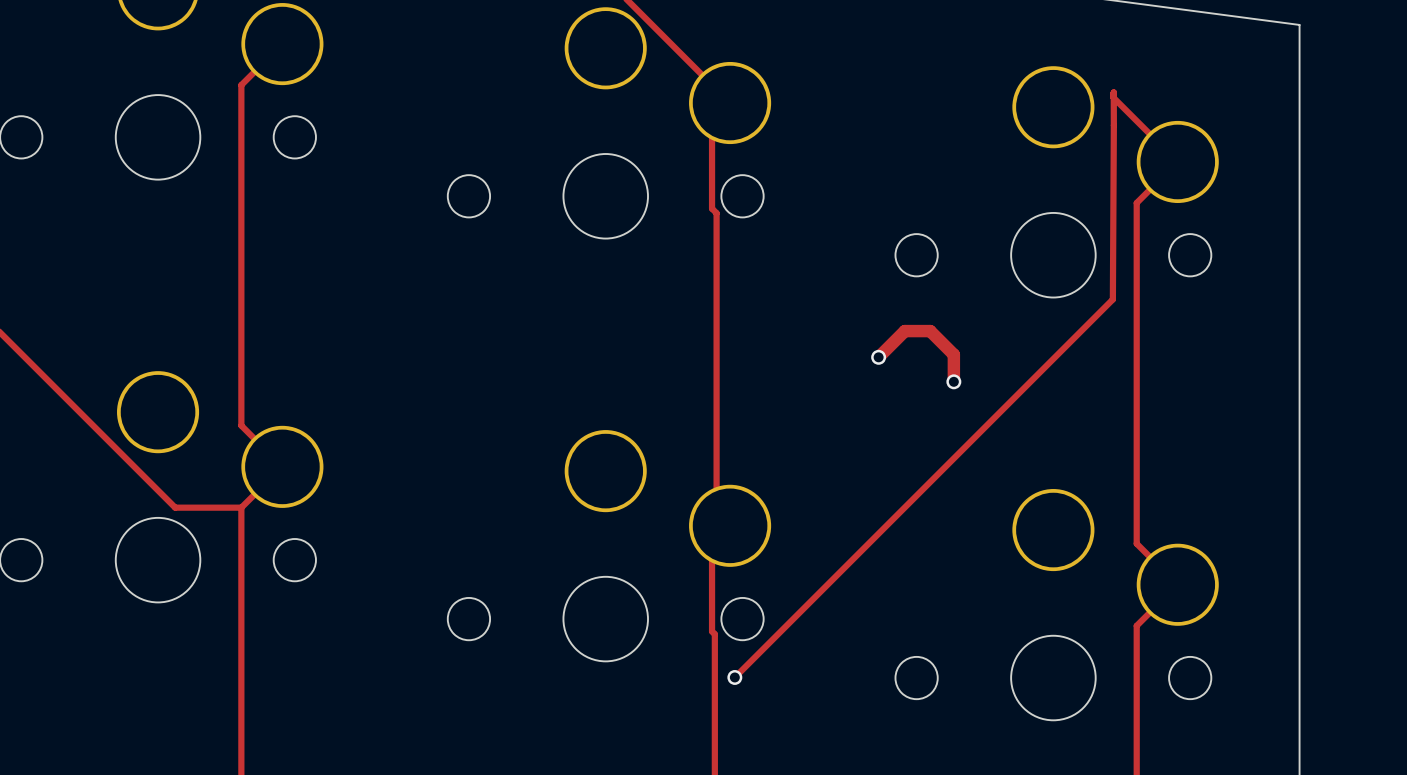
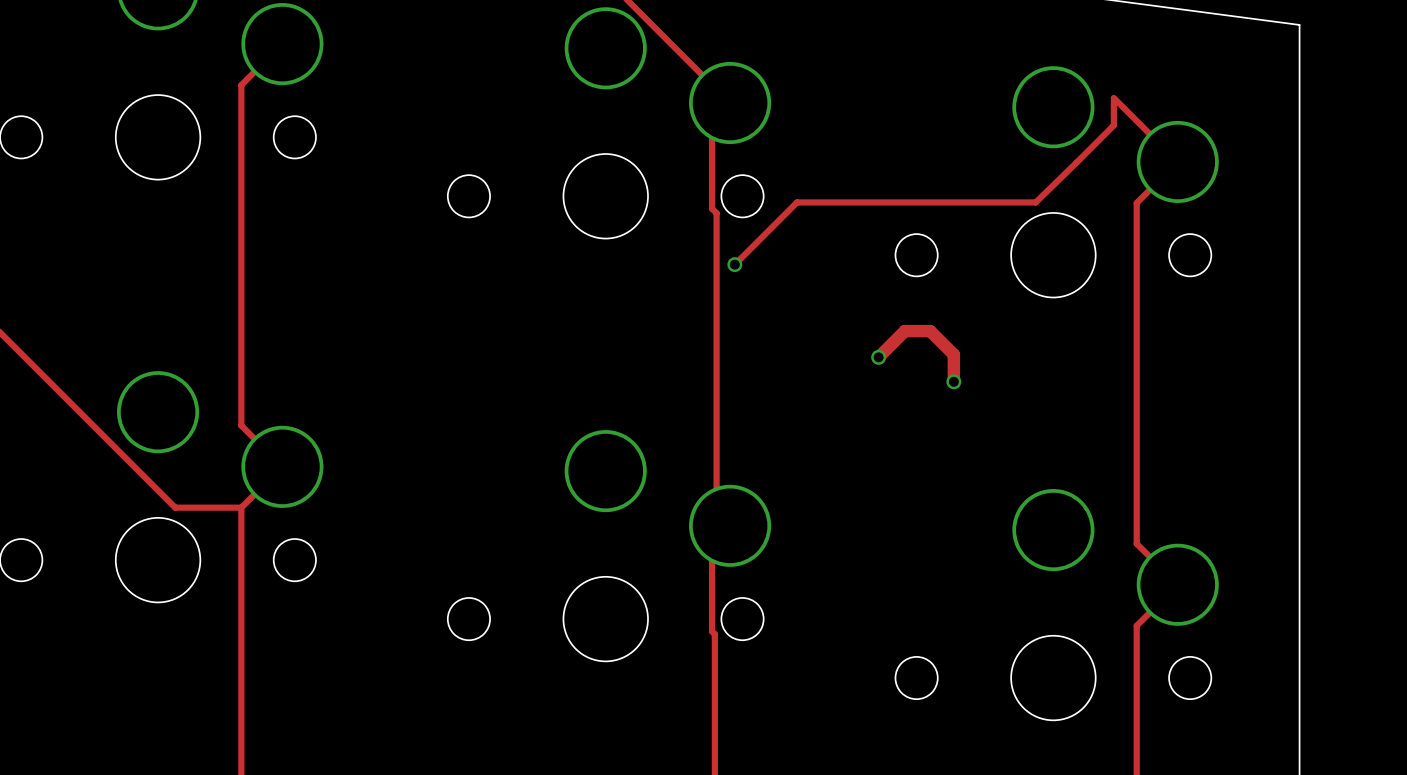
track: (1113, 92) (1112, 299) (734, 677) -> none
track: none -> (1113, 100) (1113, 125) (1035, 202) (797, 202) (734, 264)
via: none -> (734, 264)
via: (734, 677) -> none

